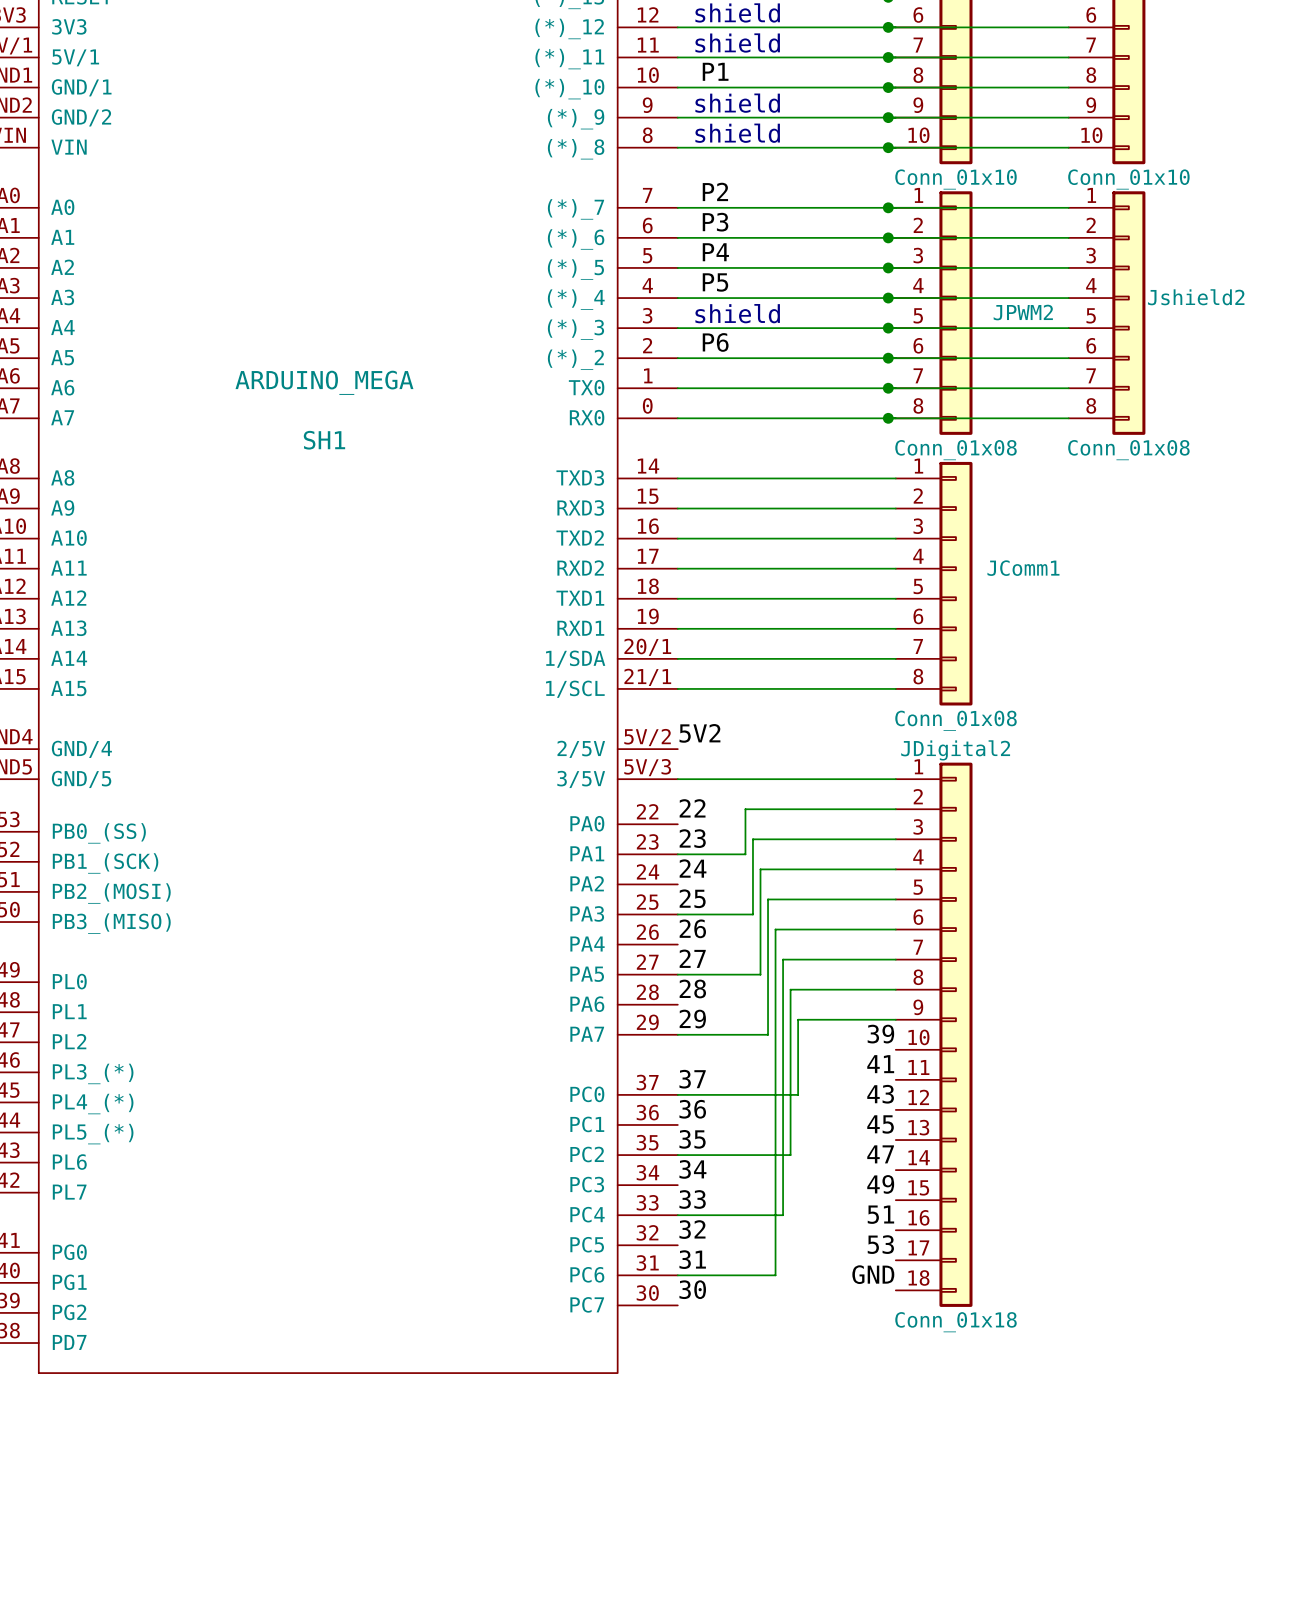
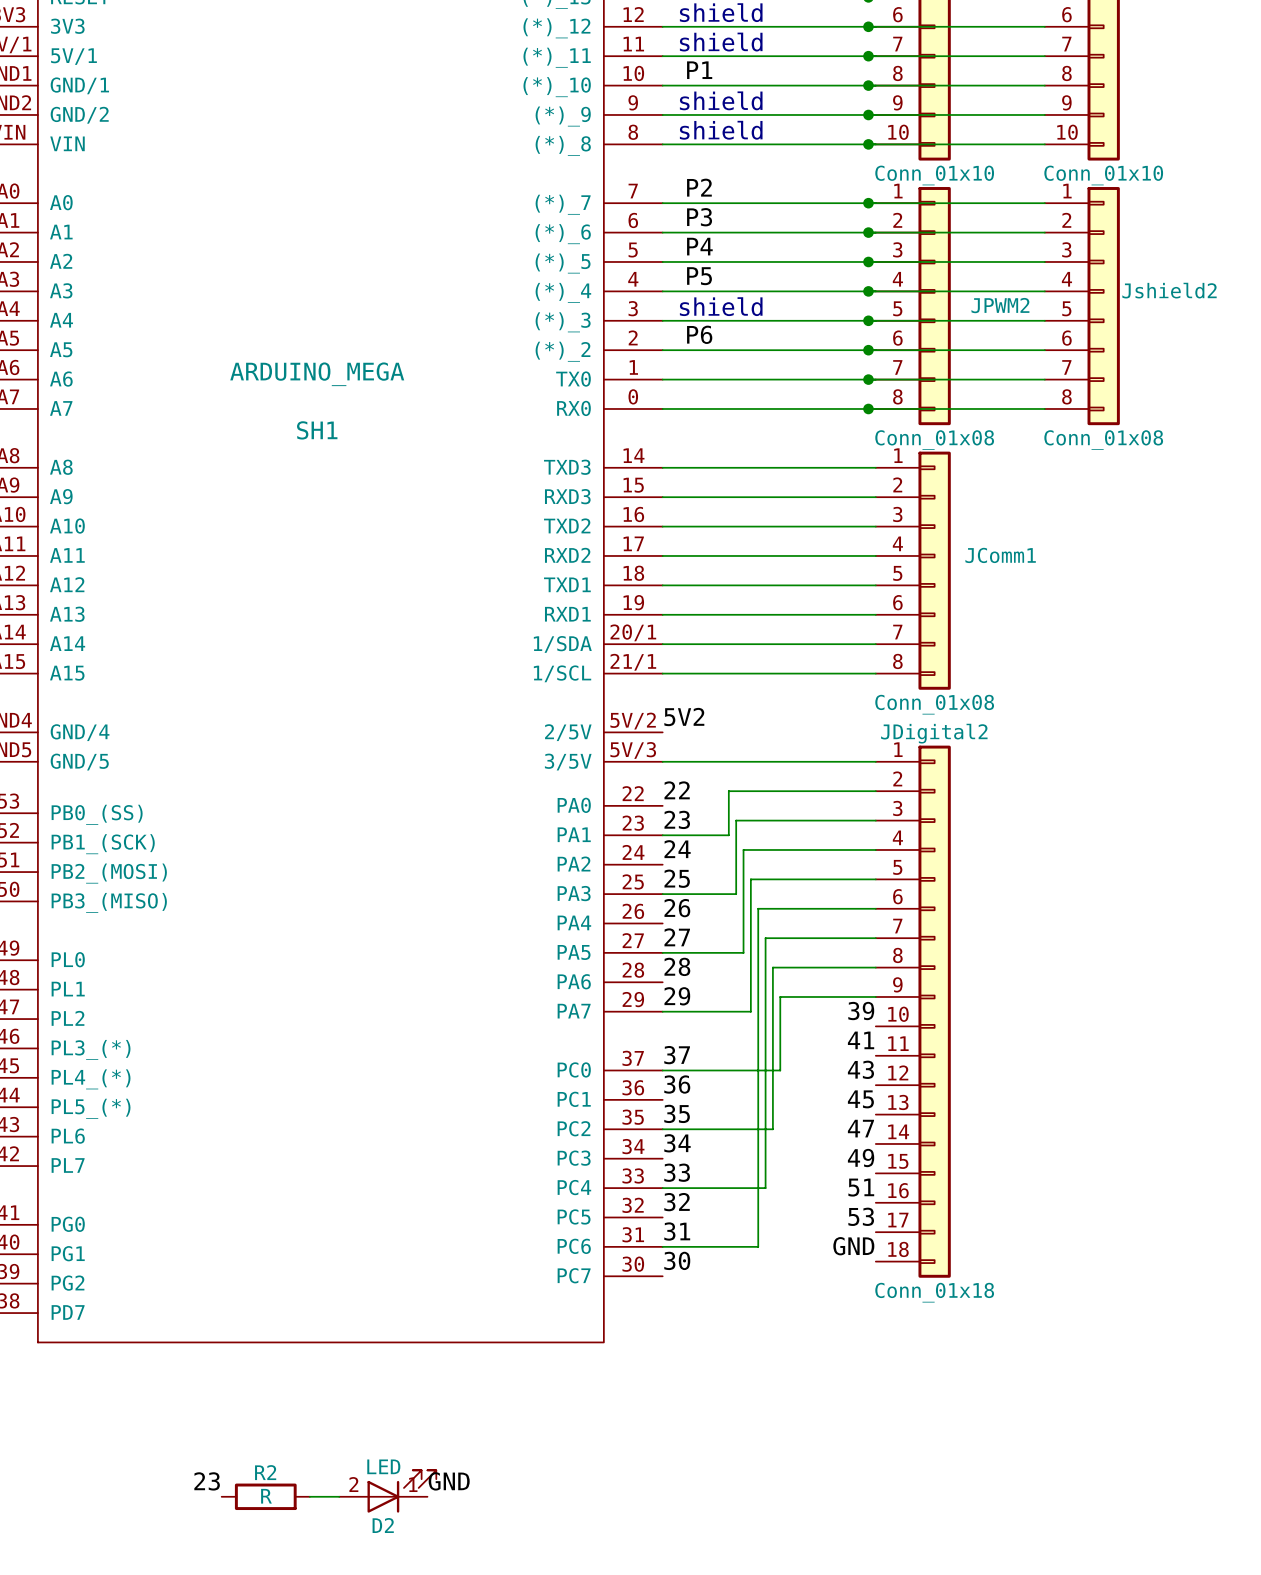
label: none -> 23 (207, 1481)
label: none -> GND (449, 1481)
D2: none -> LED (387, 1491)
R2: none -> R (265, 1496)
wire: none -> (309, 1496) (339, 1496)

